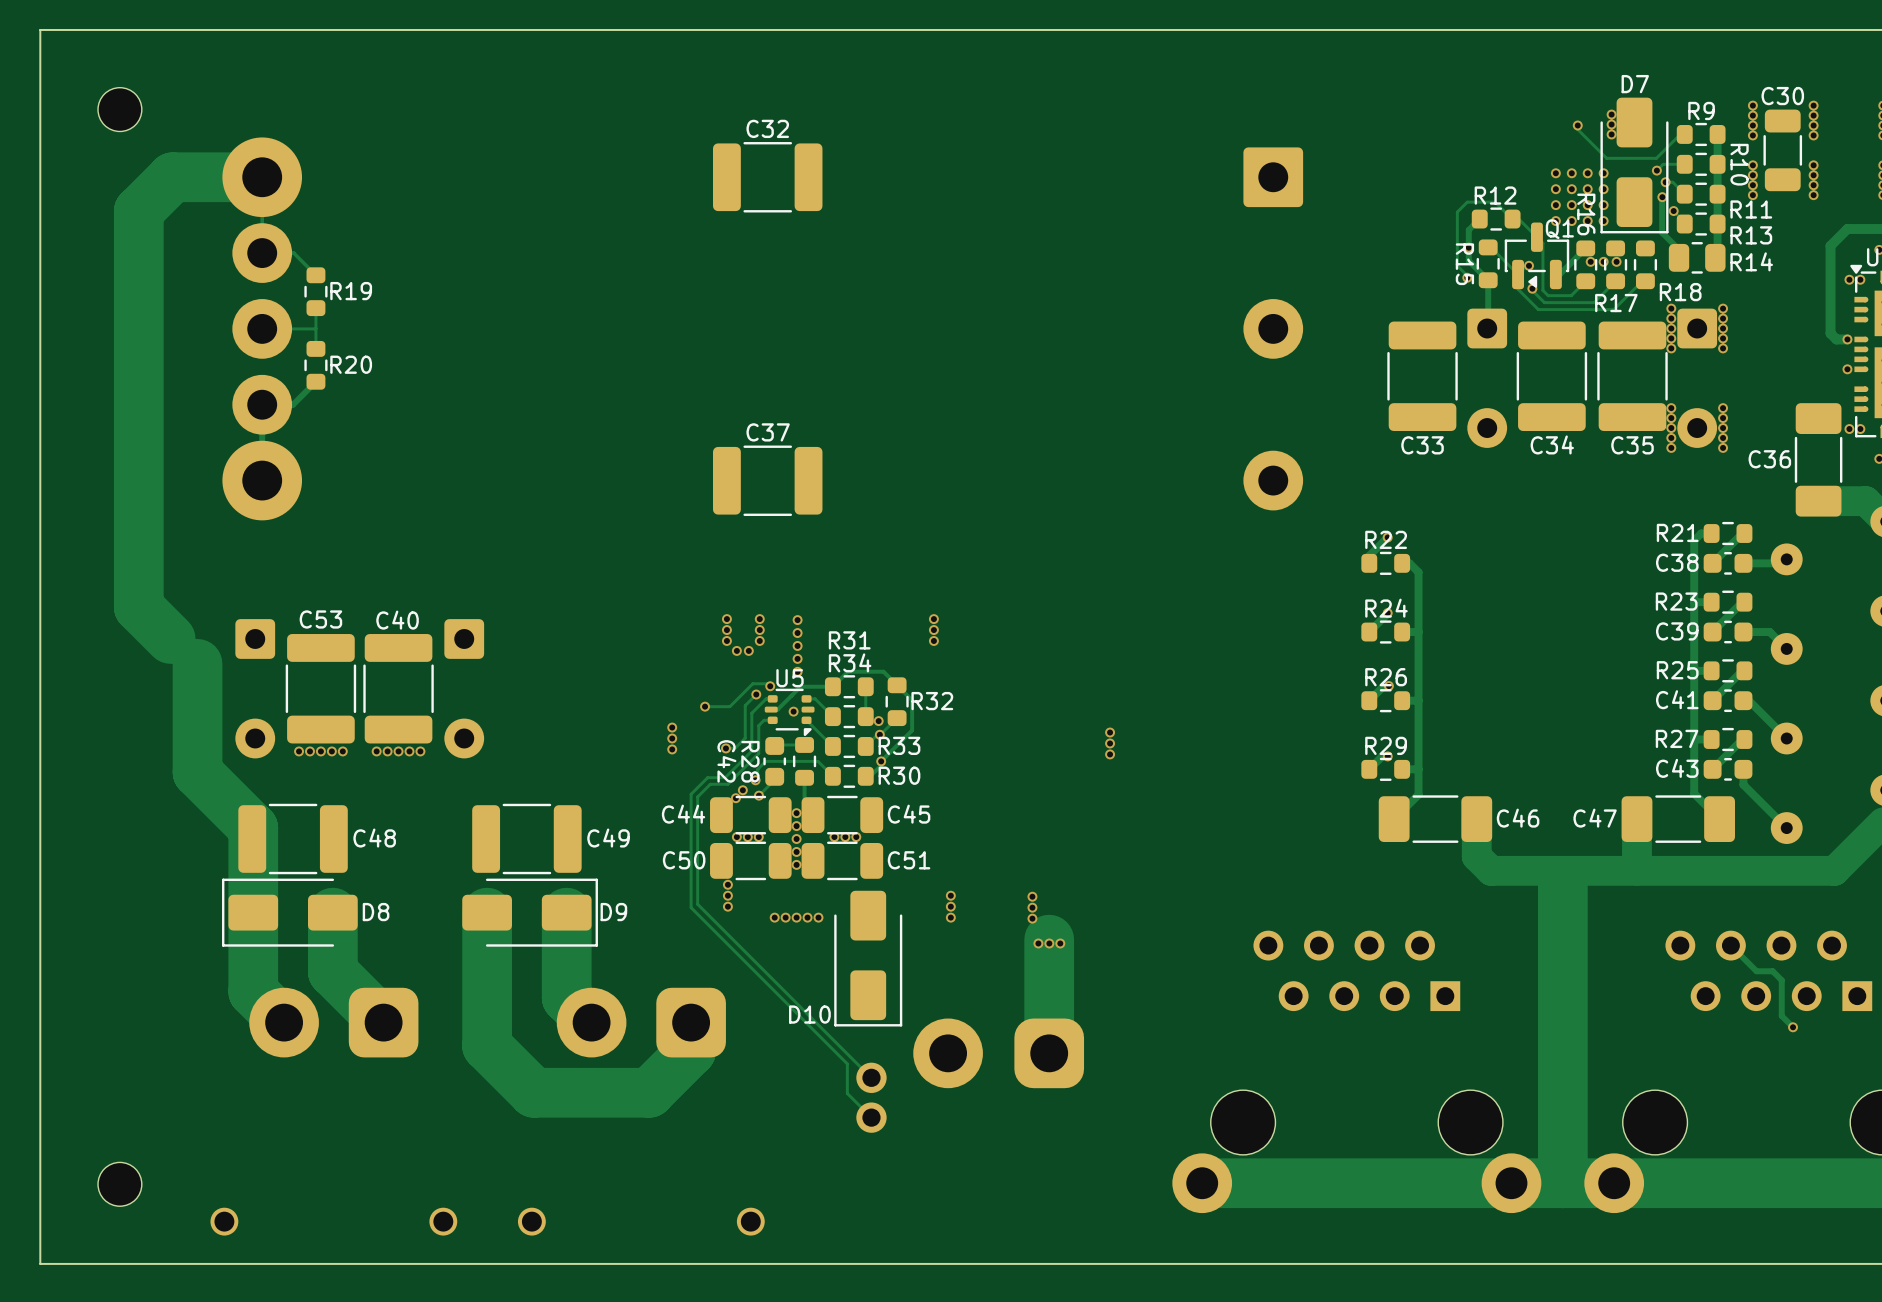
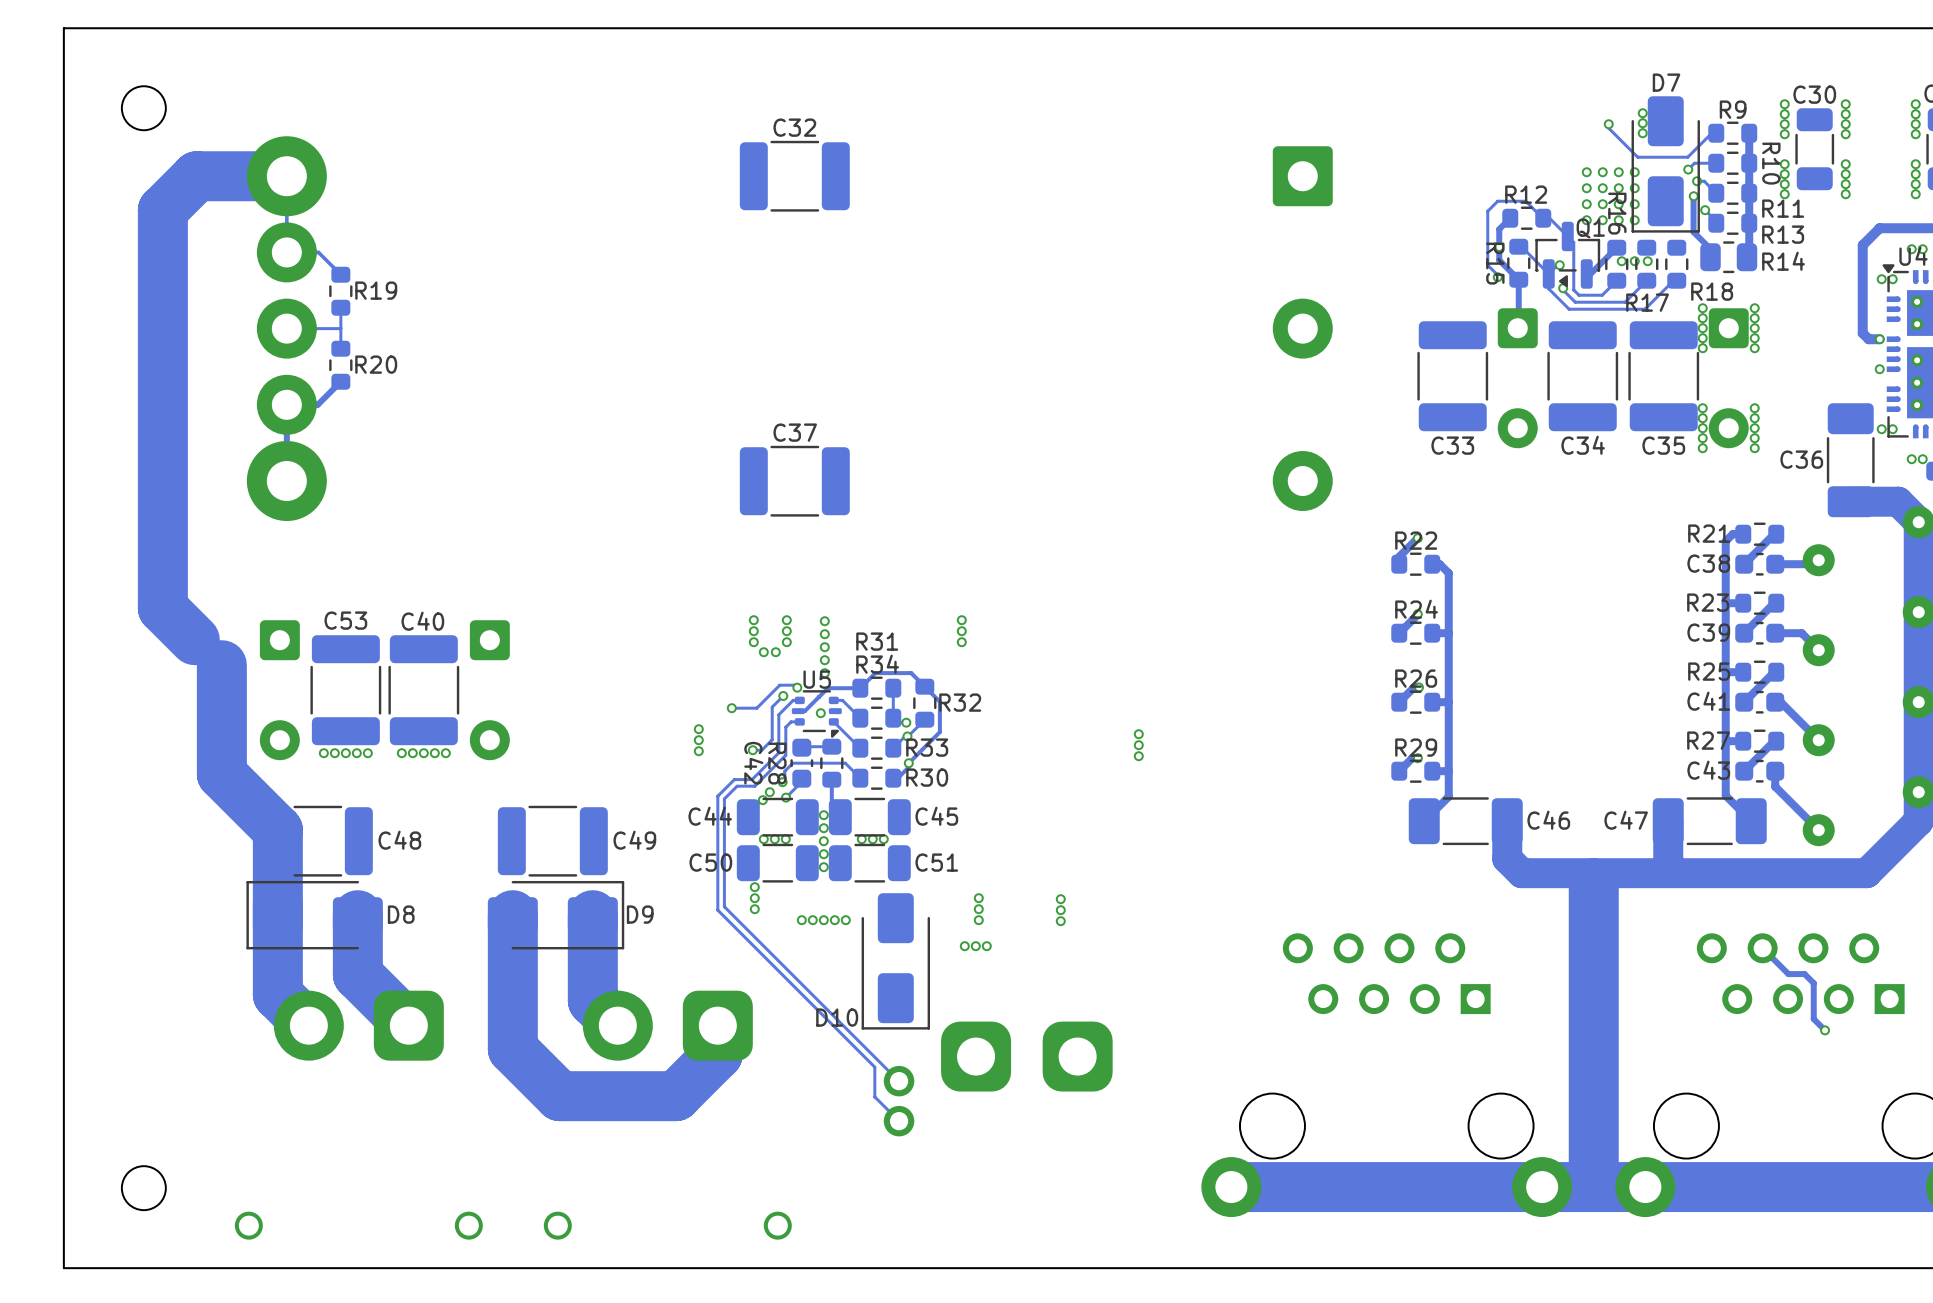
track: (1049, 939) (1049, 1053) -> none
via: none -> (964, 946)
via: none -> (975, 946)
via: none -> (986, 946)
via: (1038, 943) -> none
via: (1049, 943) -> none
via: (1060, 943) -> none
part footprint: [856, 1018, 1085, 1133] -> [883, 1021, 1113, 1137]

